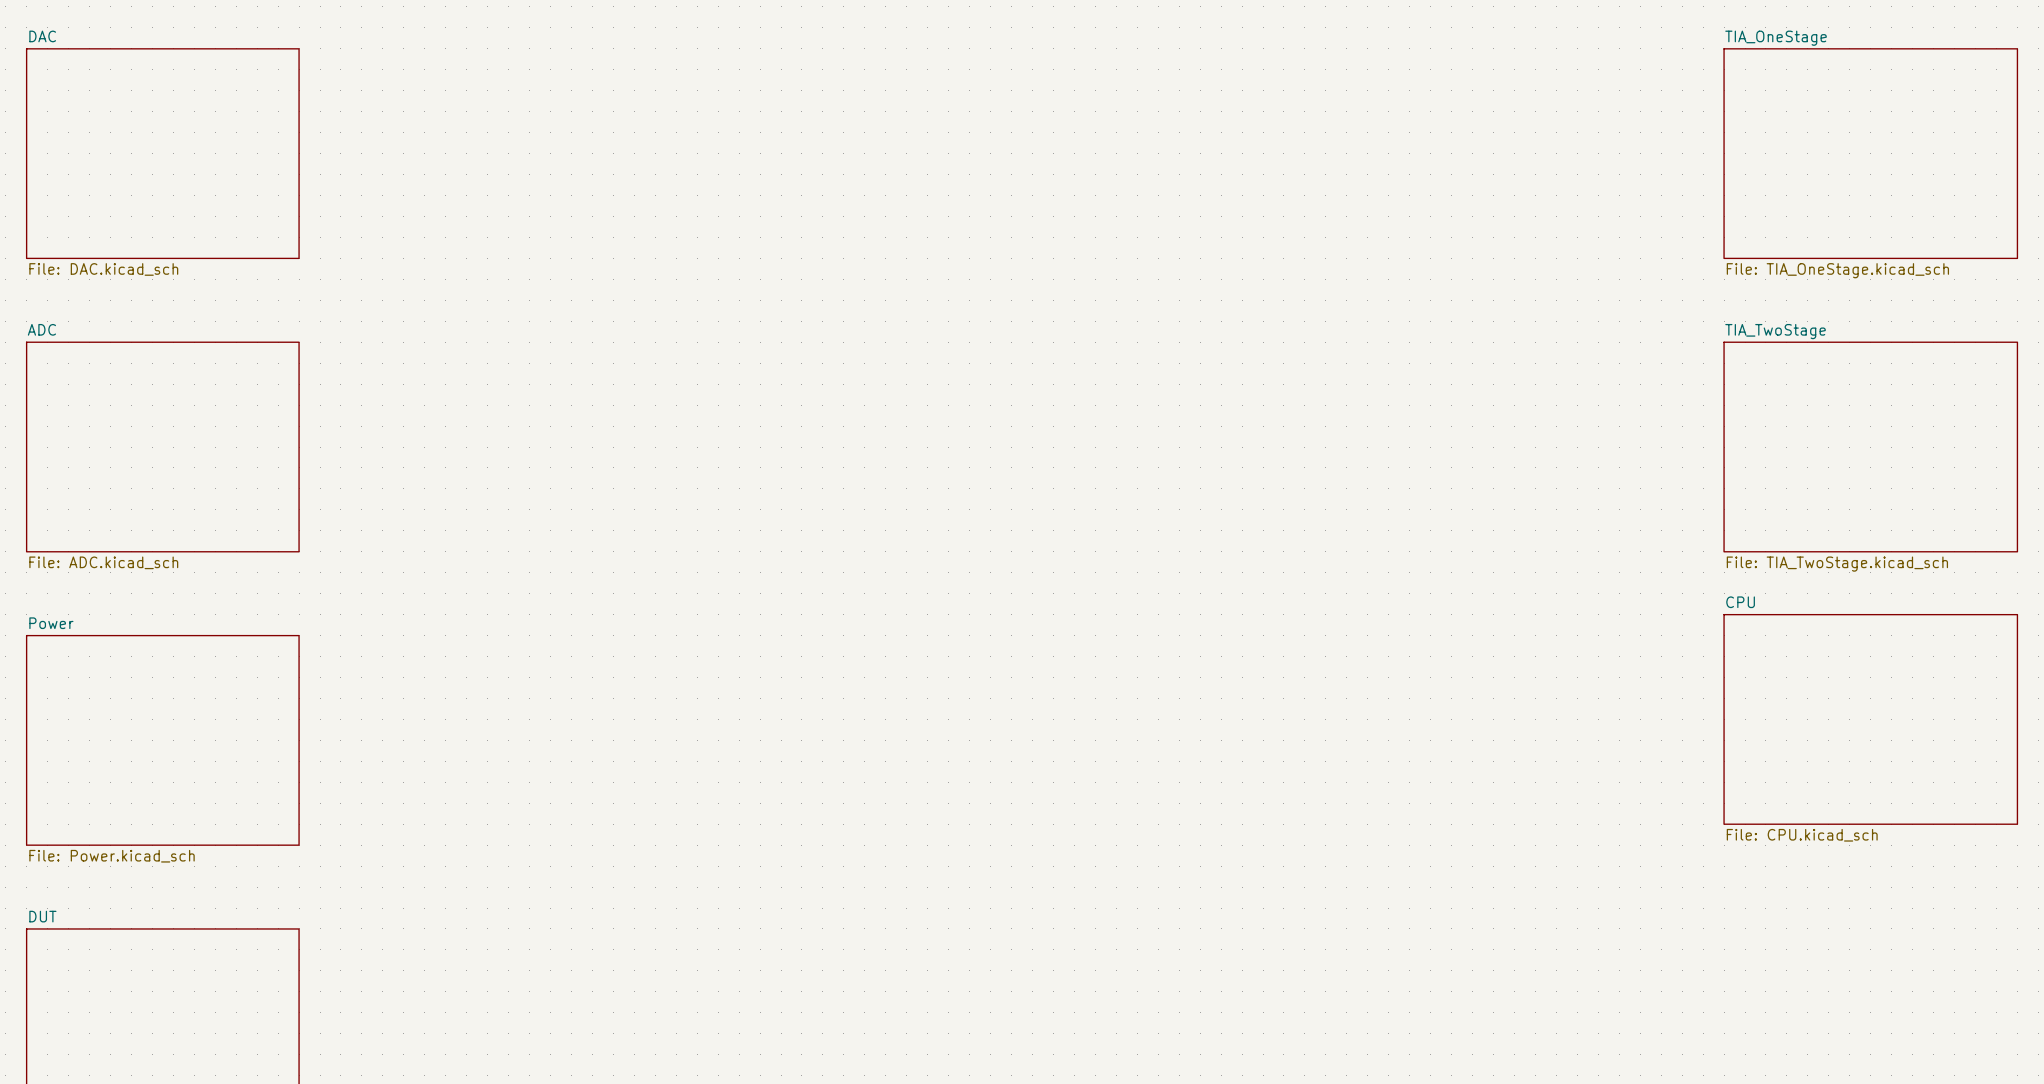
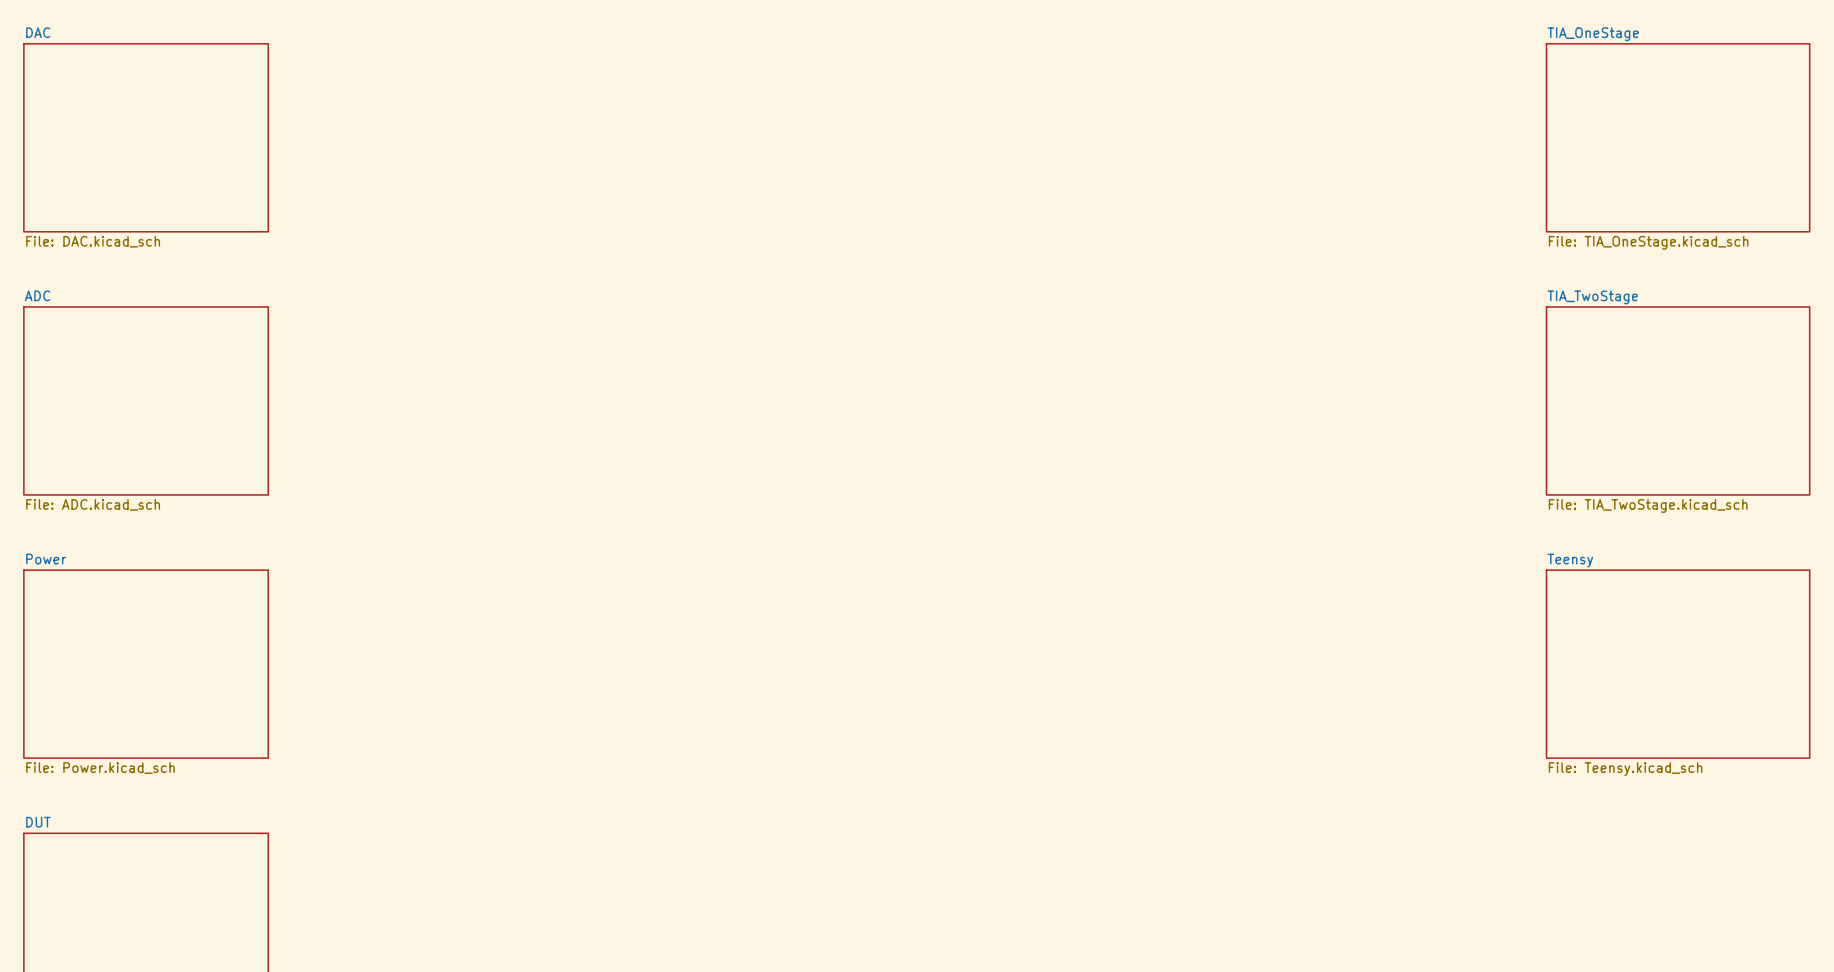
sheet CPU: File: CPU.kicad_sch (1870, 719) -> none
sheet Teensy: none -> File: Teensy.kicad_sch (1678, 664)

